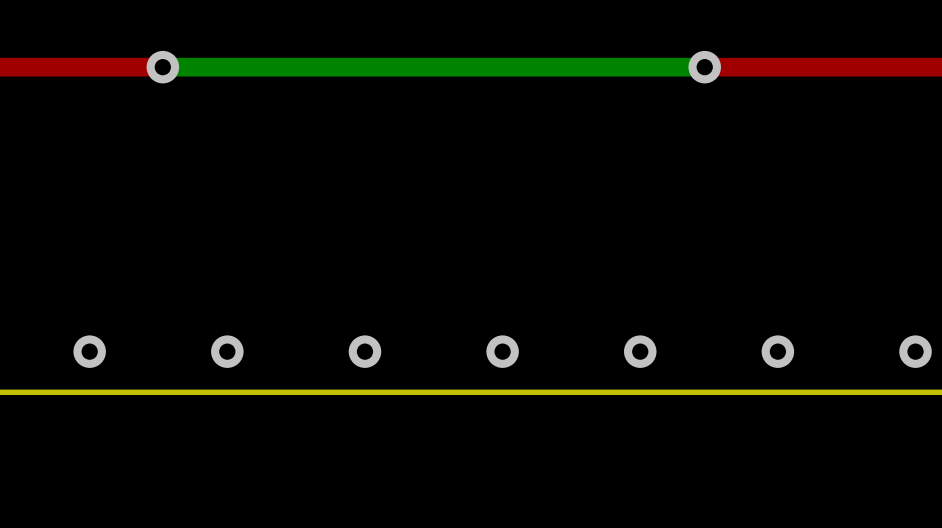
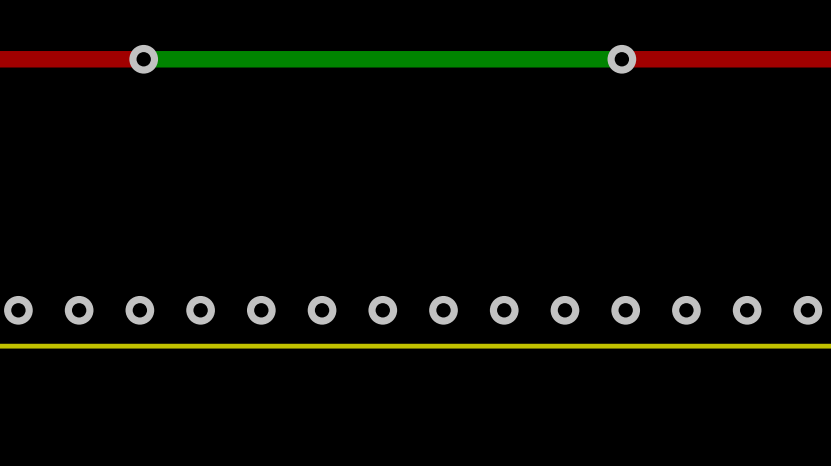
via: none -> (18, 310)
via: none -> (139, 310)
via: none -> (261, 310)
via: none -> (382, 310)
via: none -> (504, 310)
via: none -> (625, 310)
via: none -> (747, 310)

